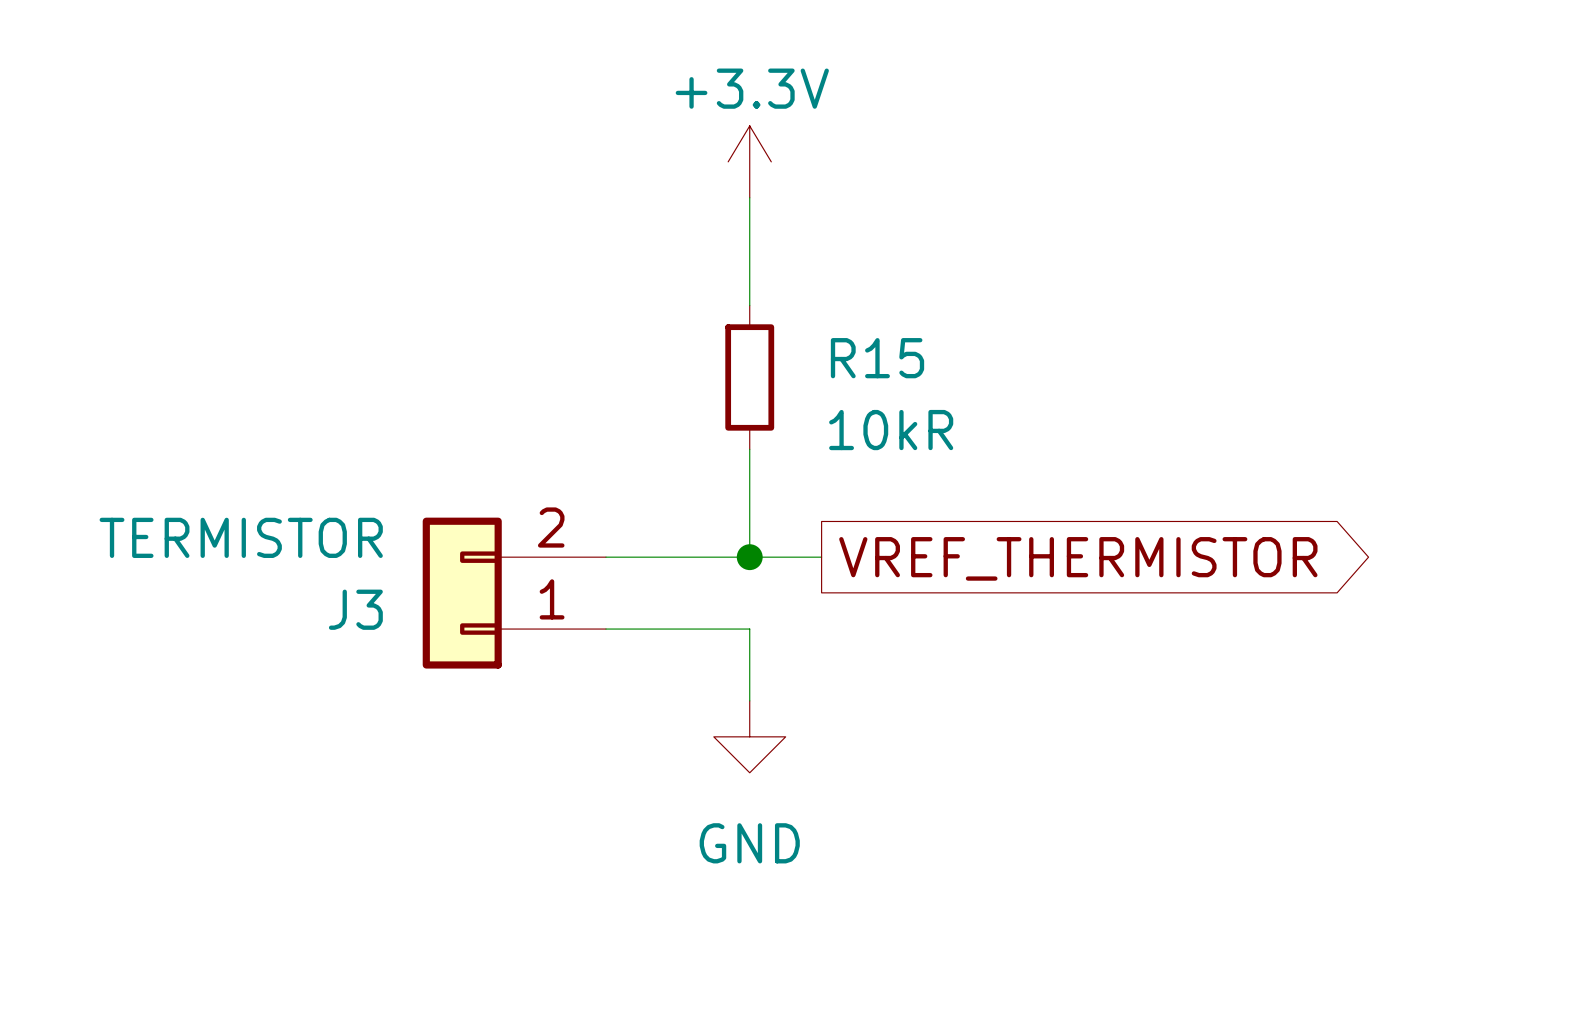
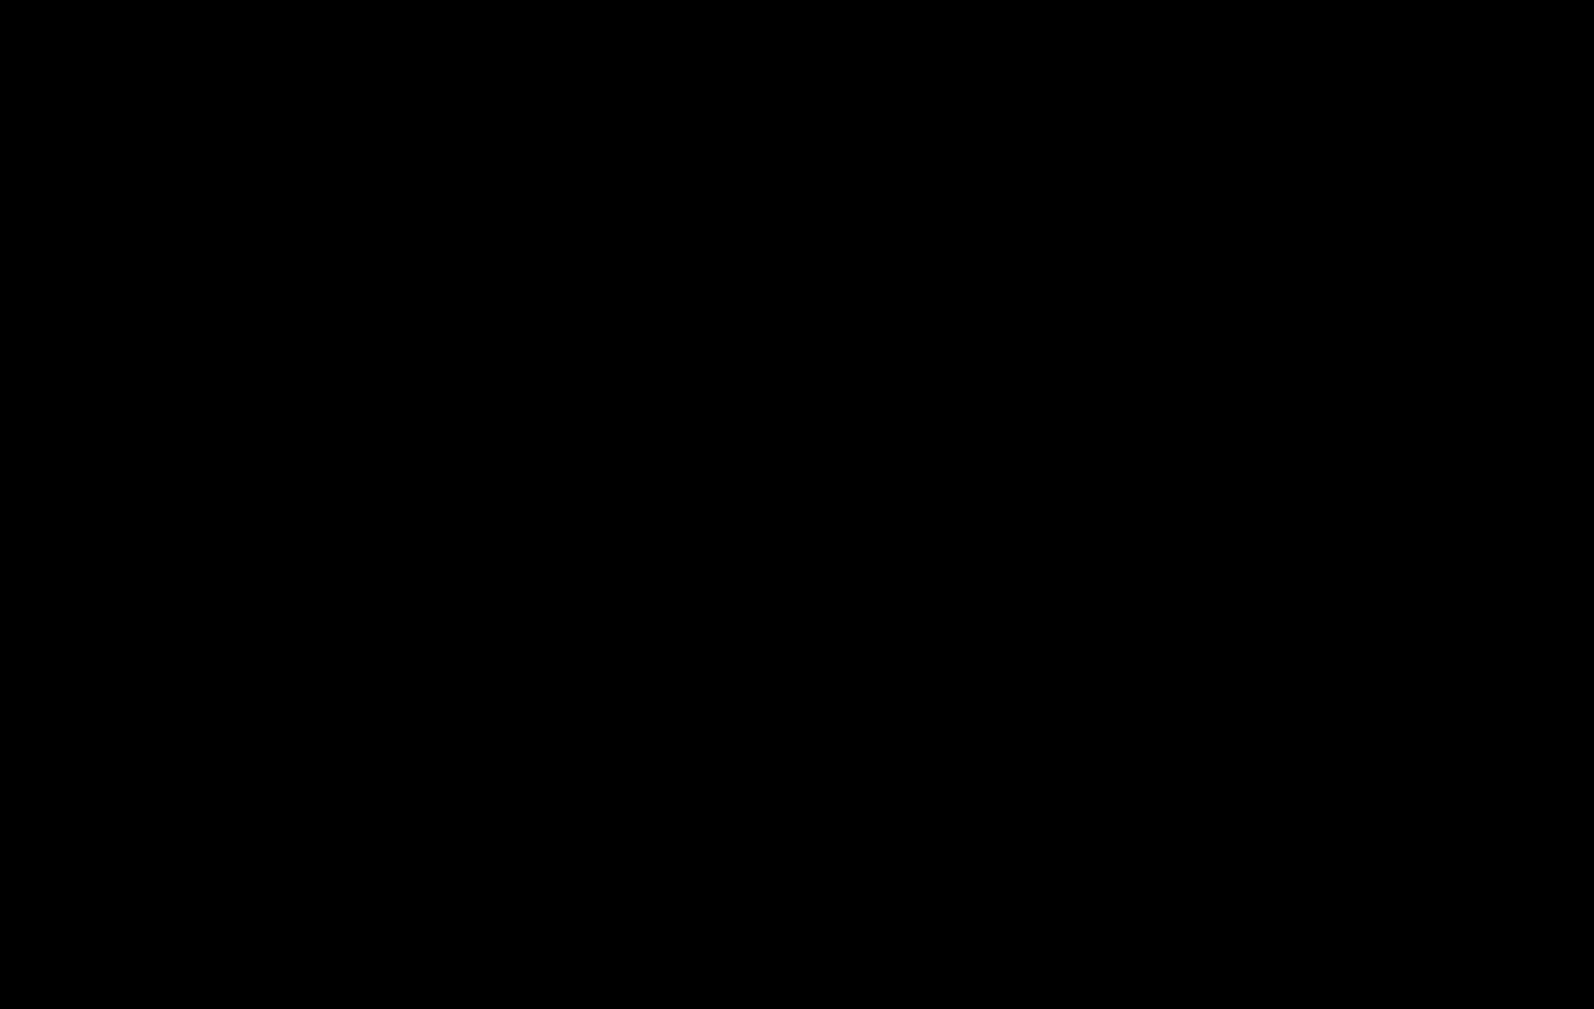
power symbol: +3.3V (749, 161) -> none
wire: (749, 197) (749, 305) -> none
R15: 10kR (749, 377) -> none
wire: (749, 449) (749, 557) -> none
wire: (605, 557) (821, 557) -> none
junction: (749, 557) -> none
global label: VREF_THERMISTOR (1078, 558) -> none
J3: TERMISTOR (514, 593) -> none
wire: (605, 629) (749, 629) (749, 700) -> none
power symbol: GND (749, 736) -> none

